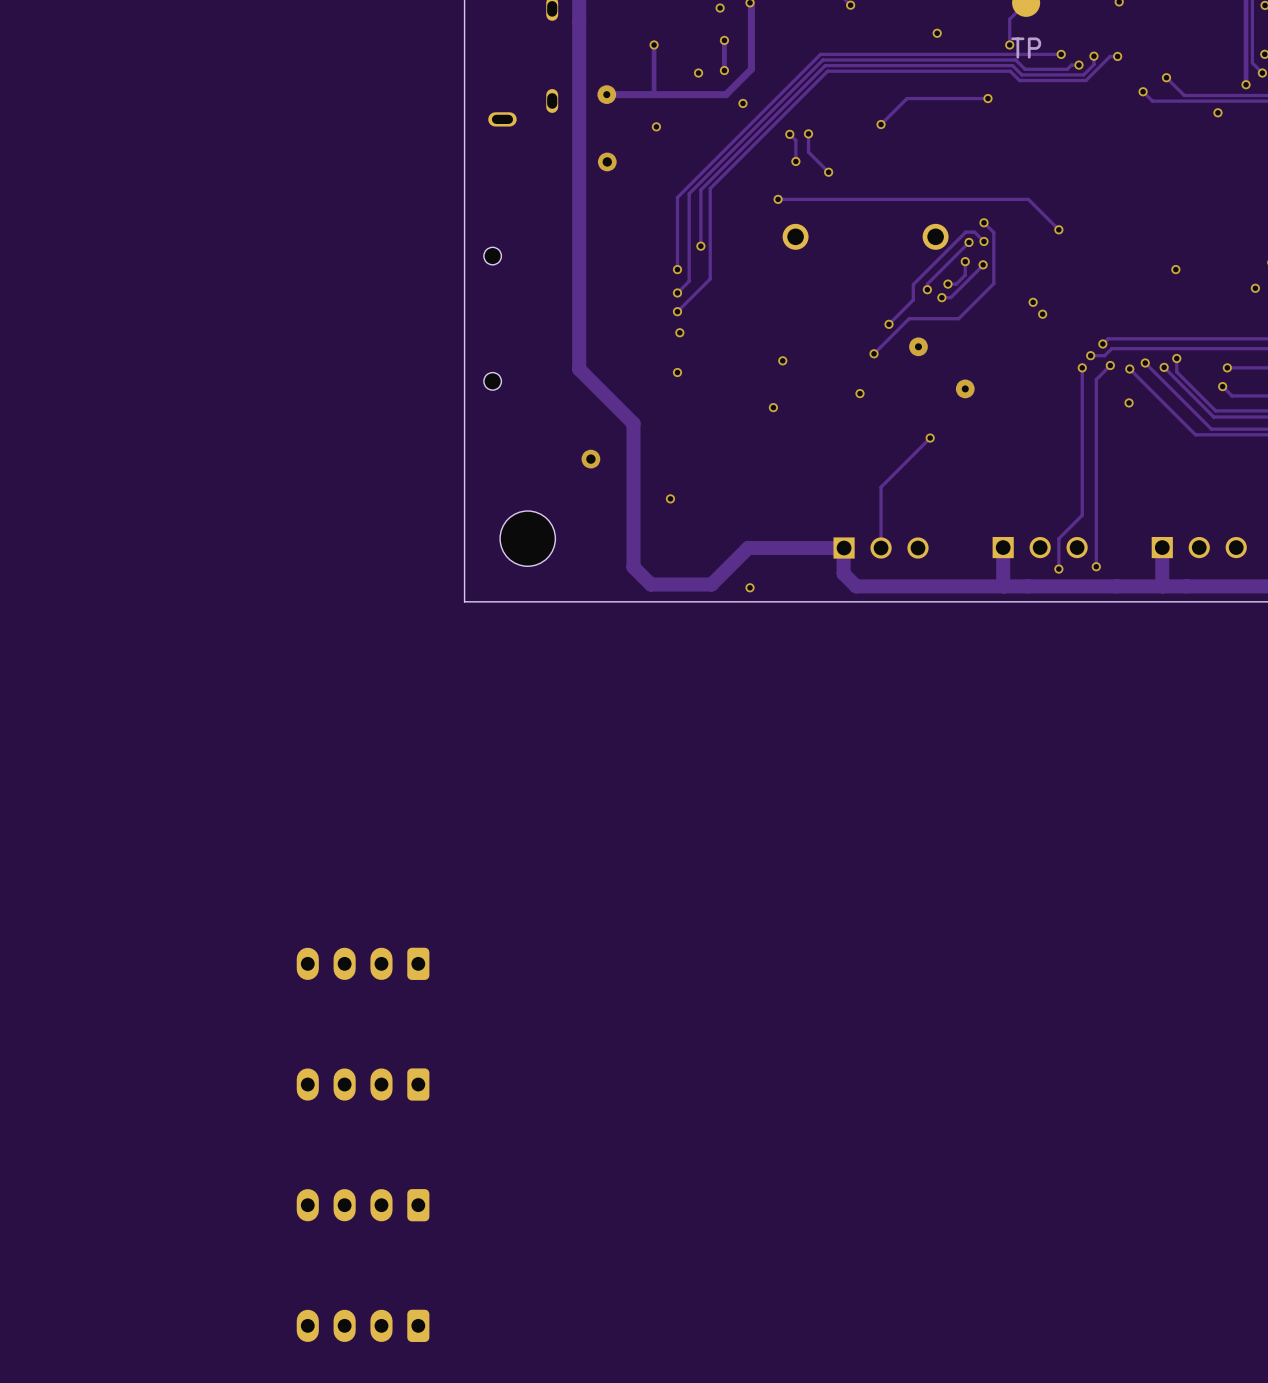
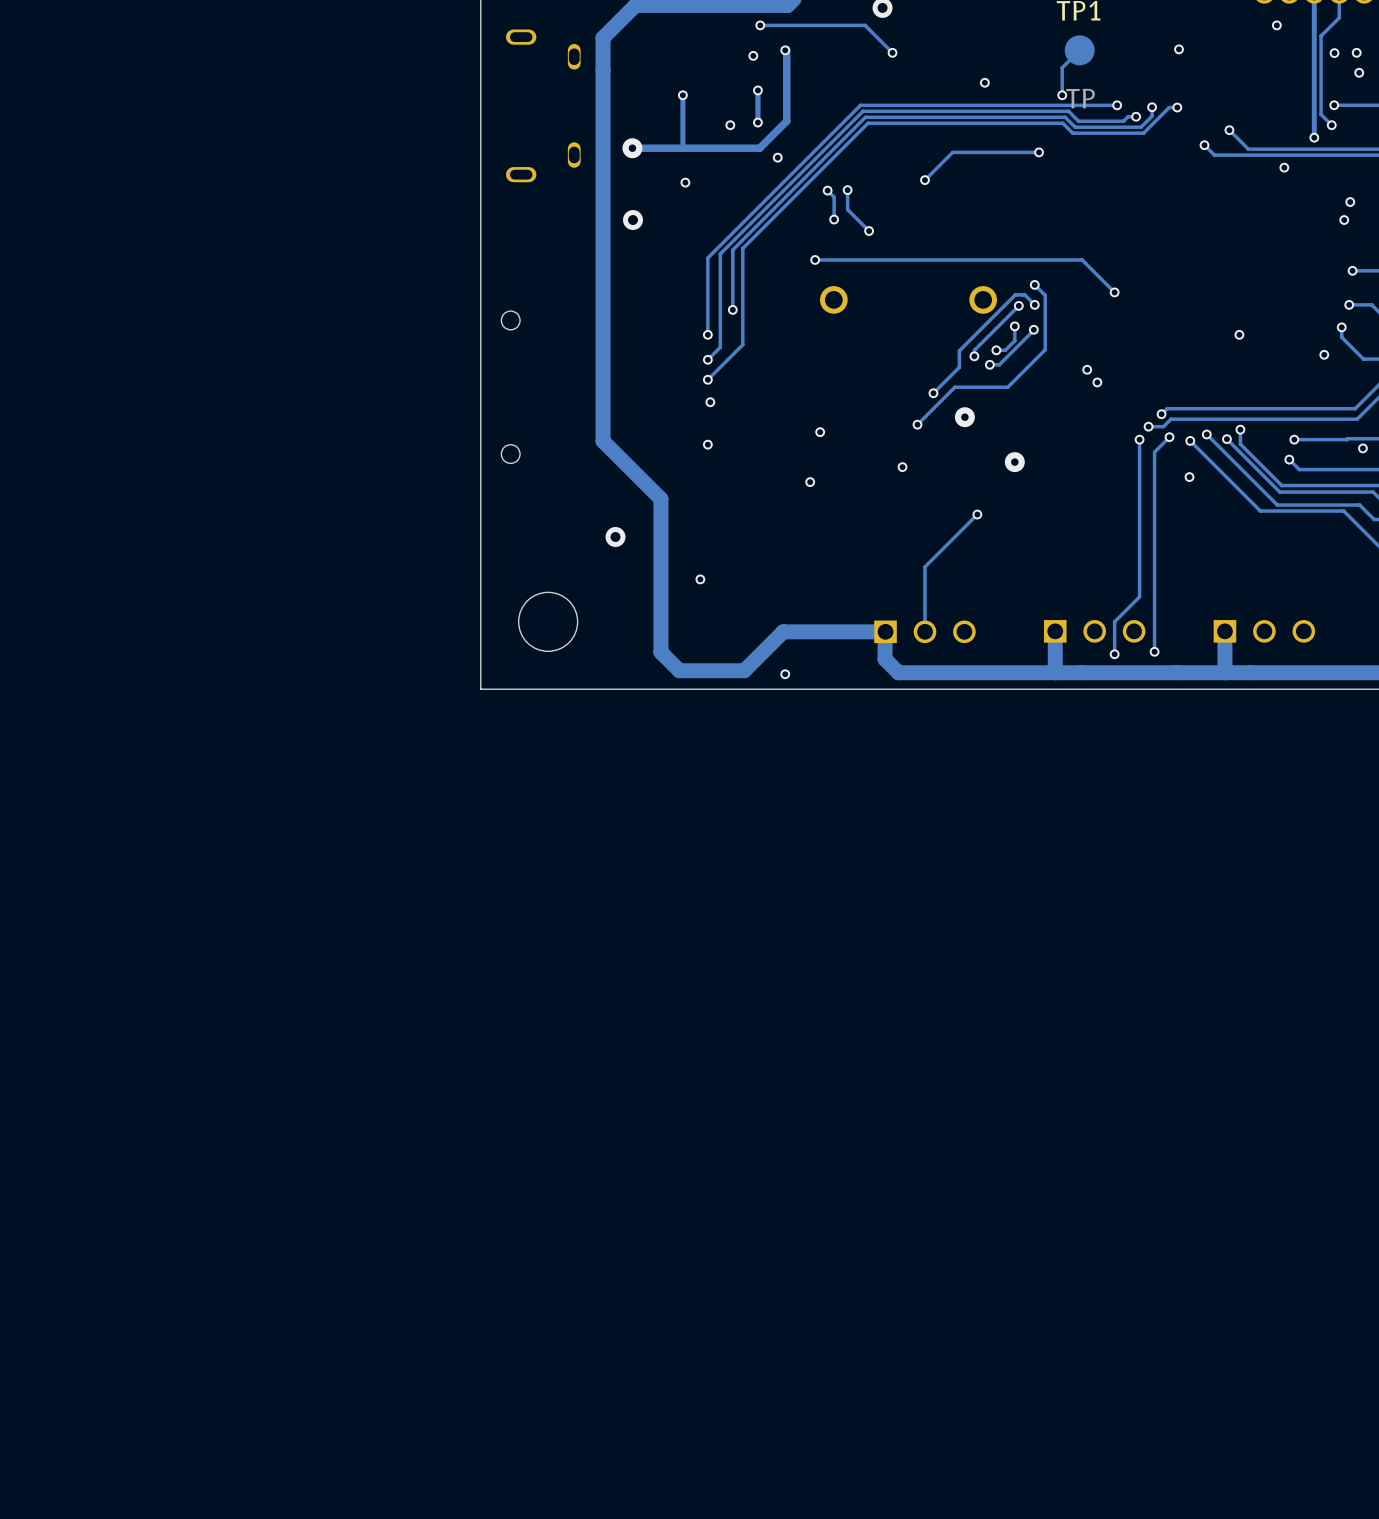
part: (363, 963) -> none
part: (363, 1084) -> none
part: (363, 1205) -> none
part: (363, 1325) -> none

